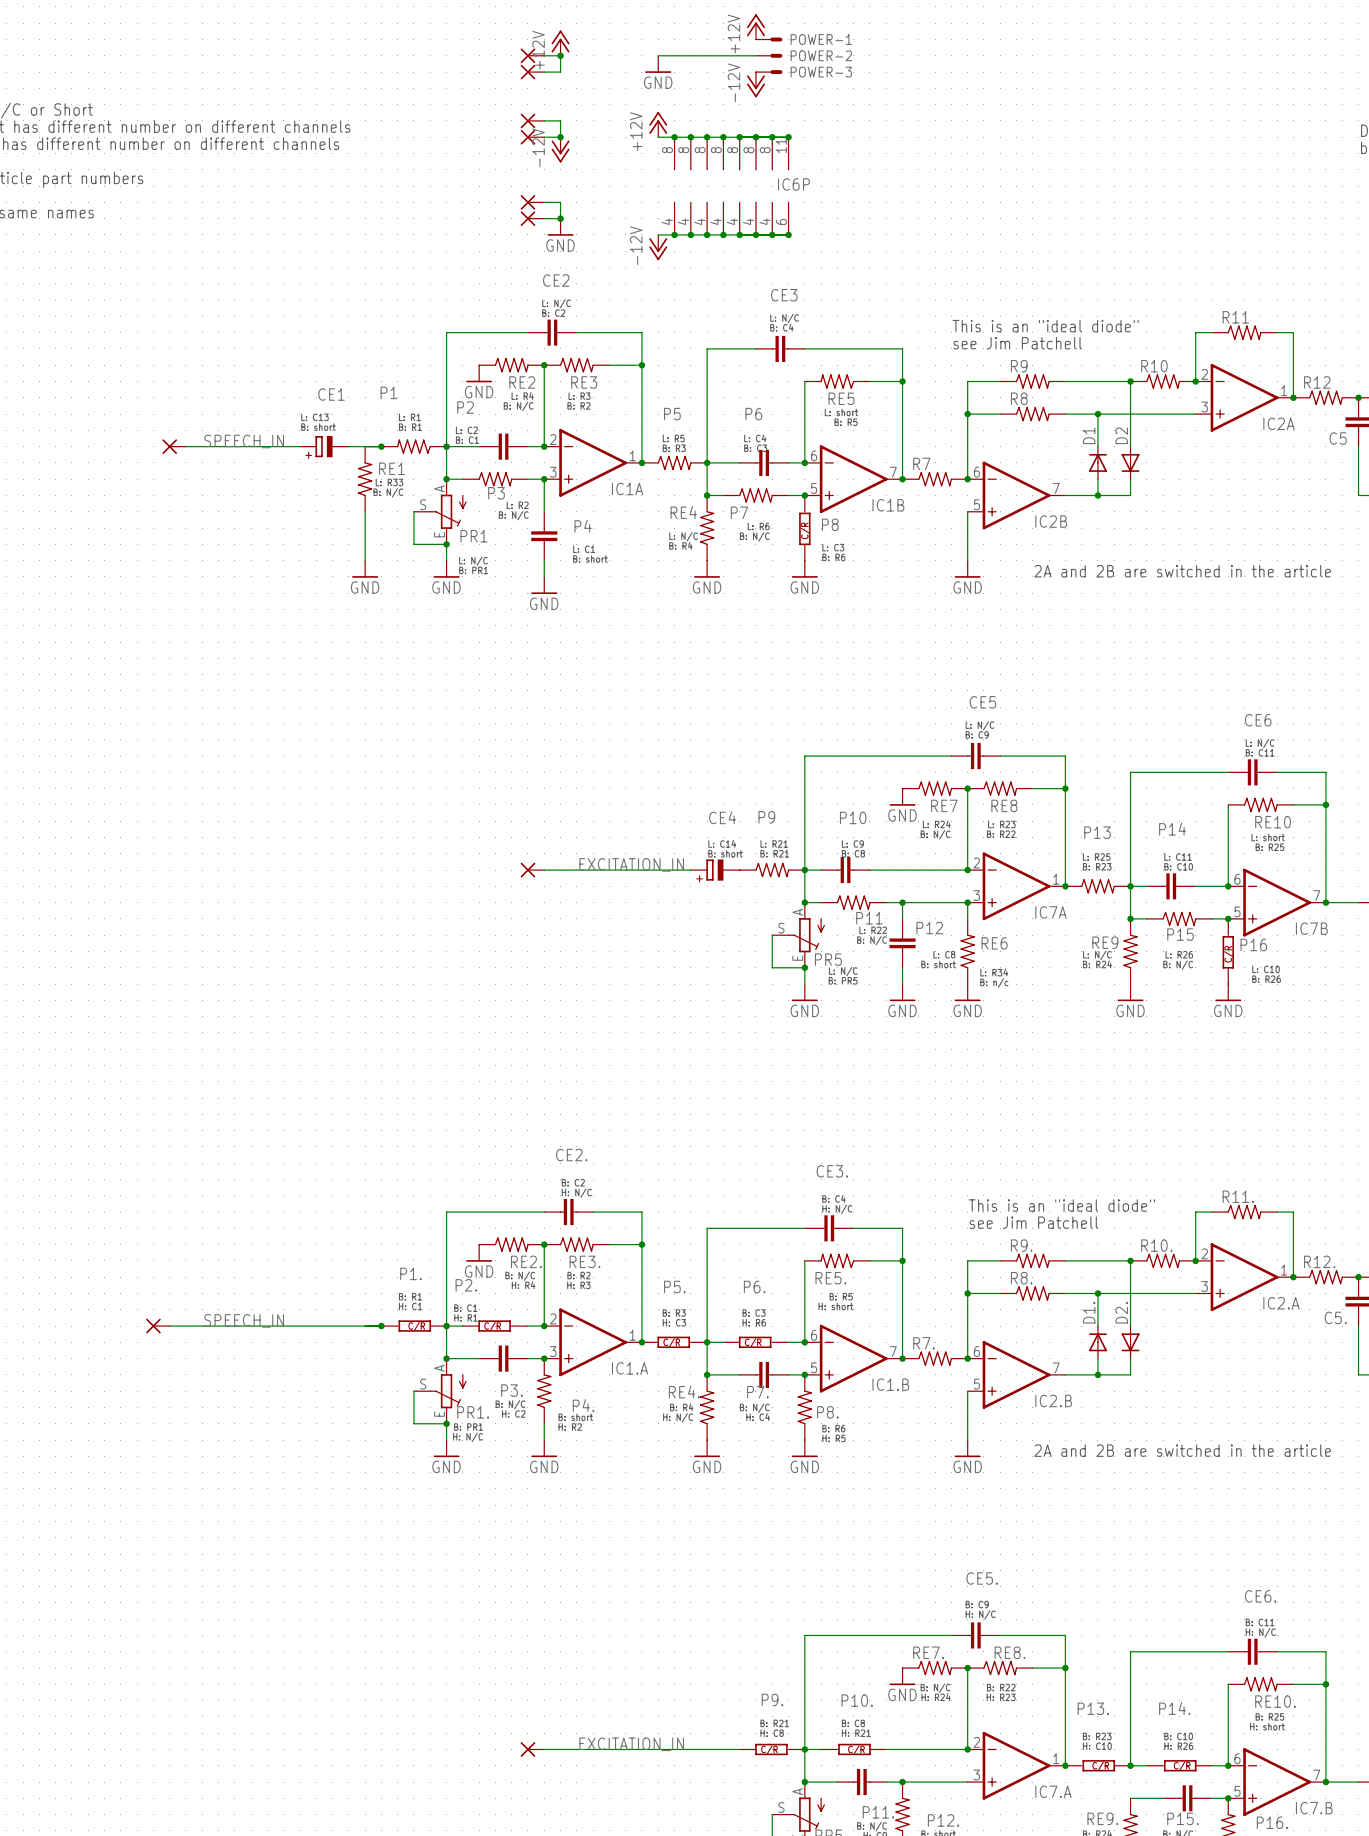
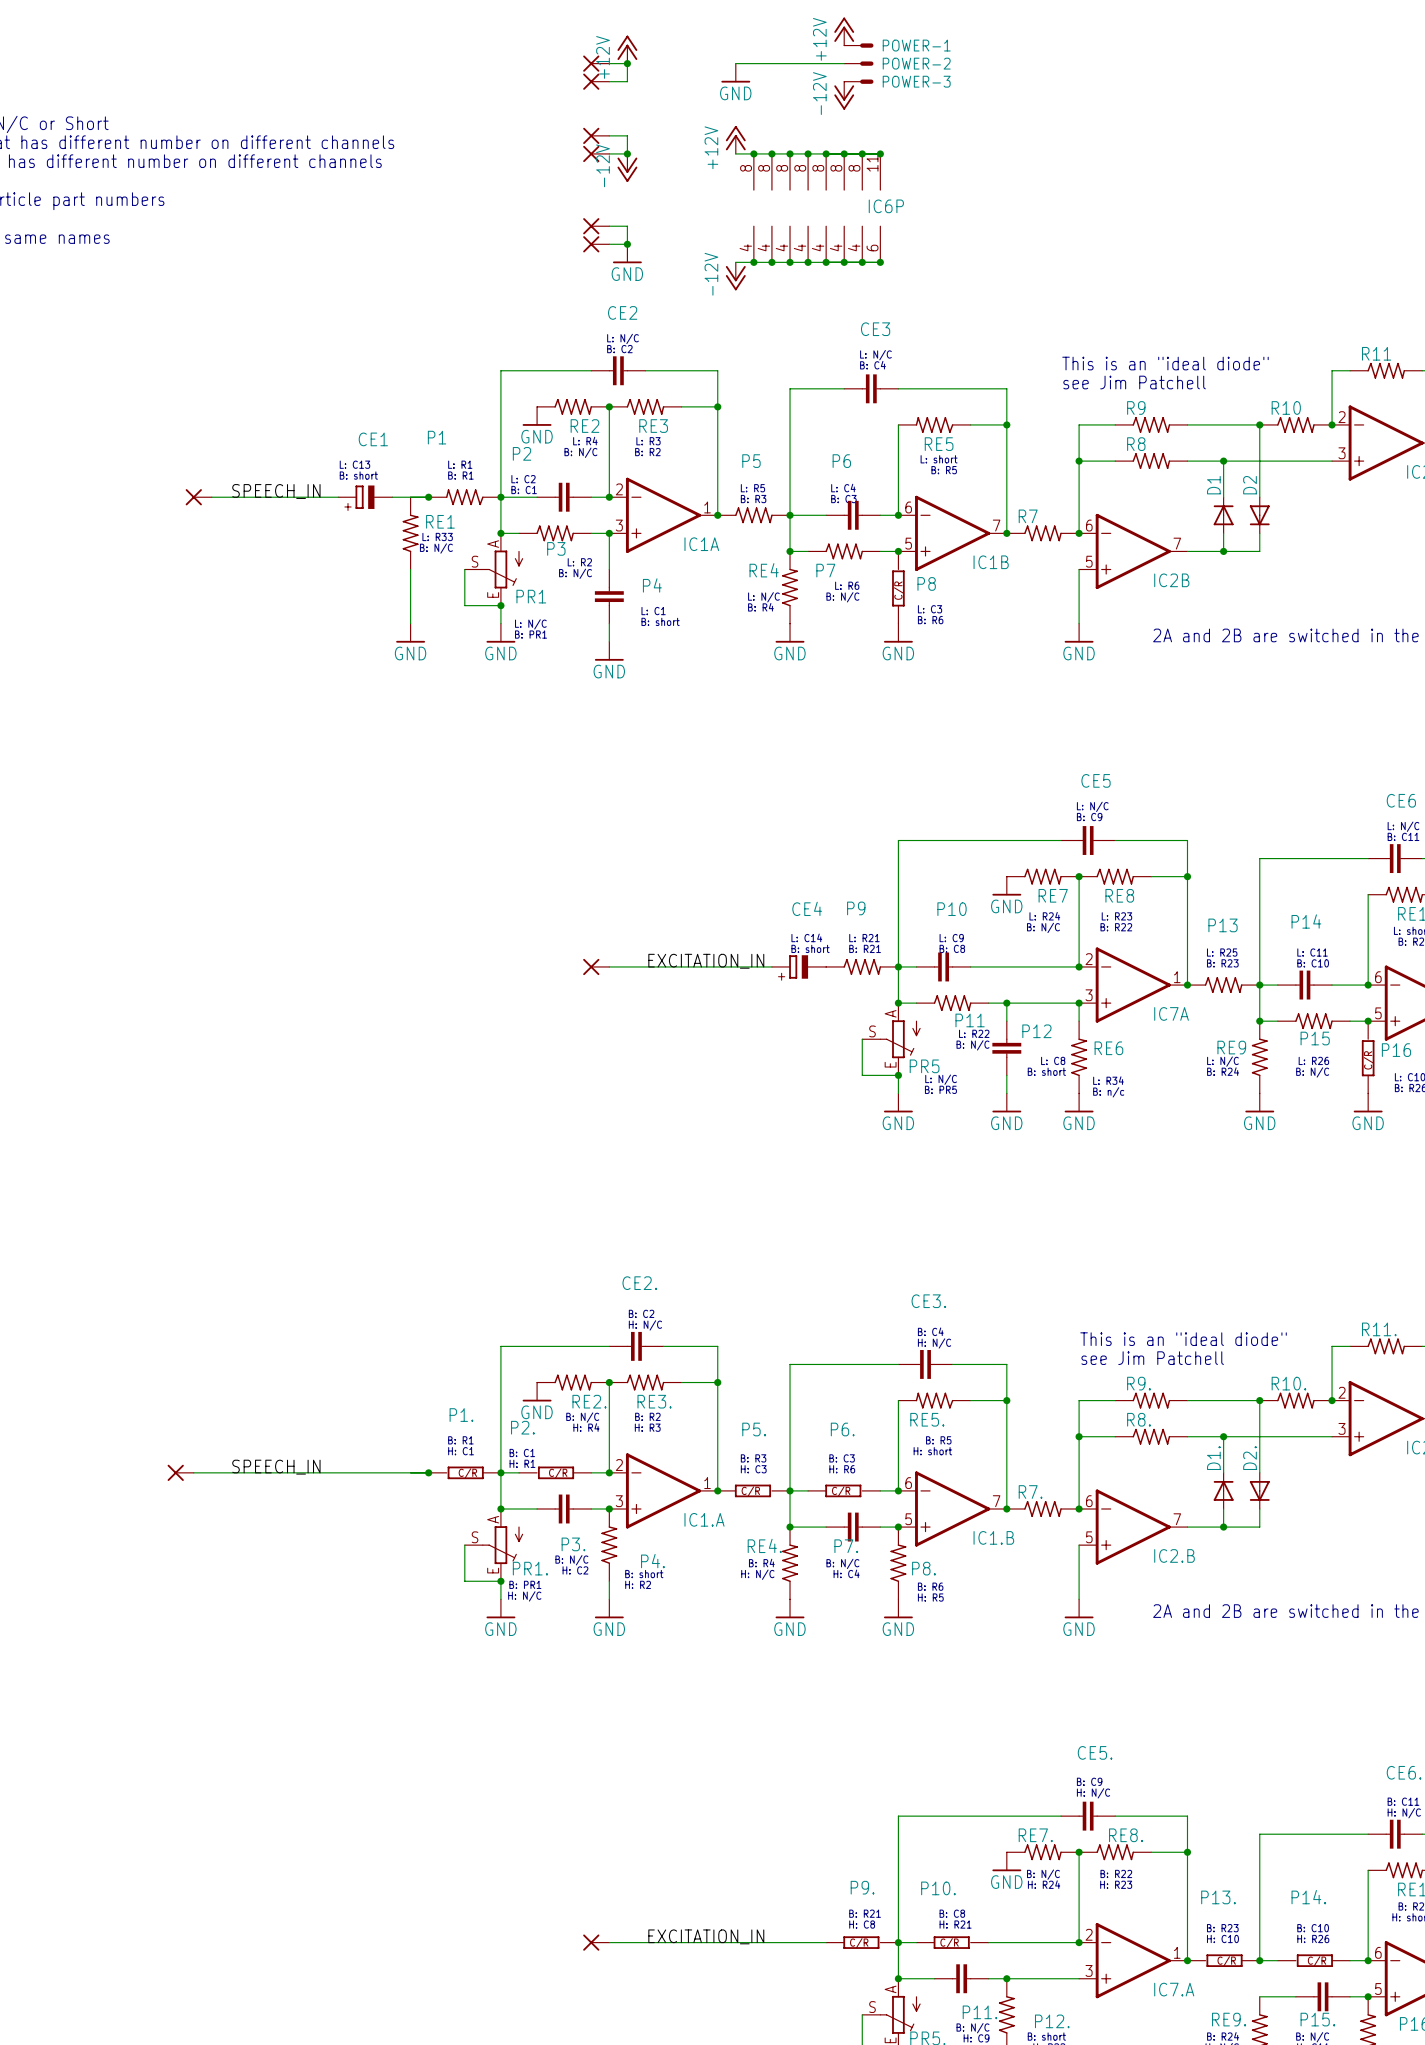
P2. symbol: [462, 1320, 528, 1332] -> [519, 1466, 592, 1480]
P10. name position: P10. (857, 1700) -> P10. (938, 1888)
P10. symbol: [821, 1743, 887, 1756] -> [916, 1936, 989, 1949]

